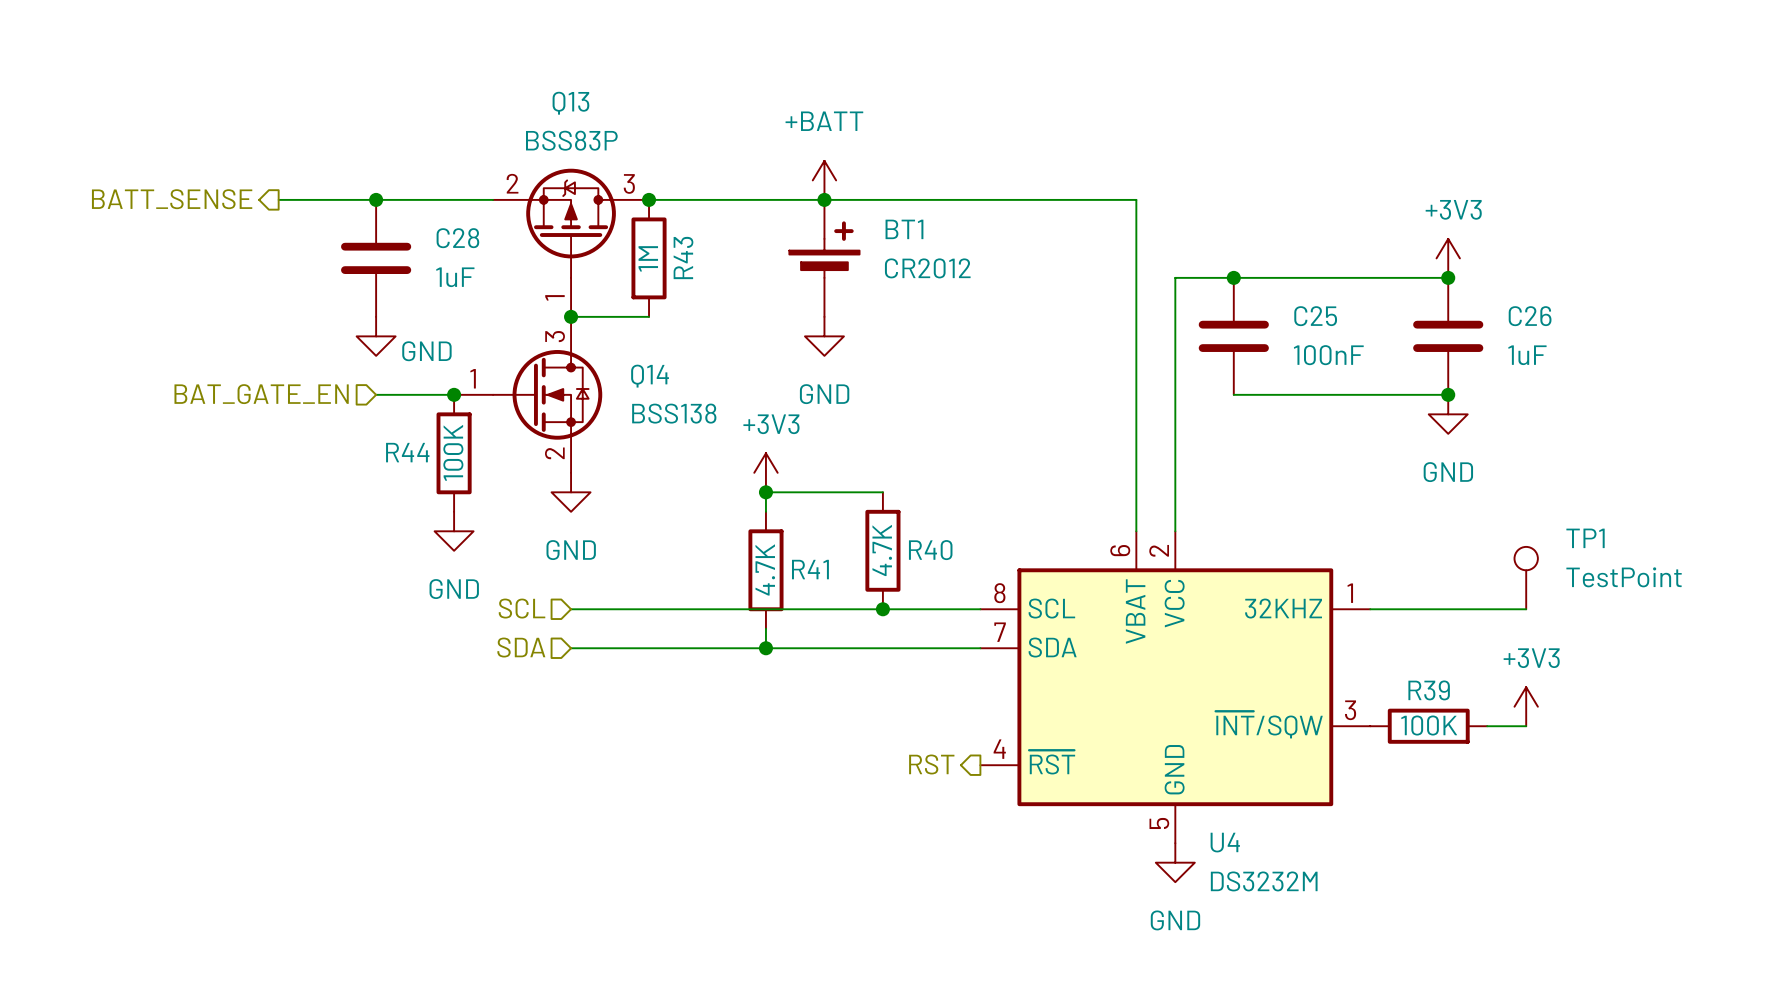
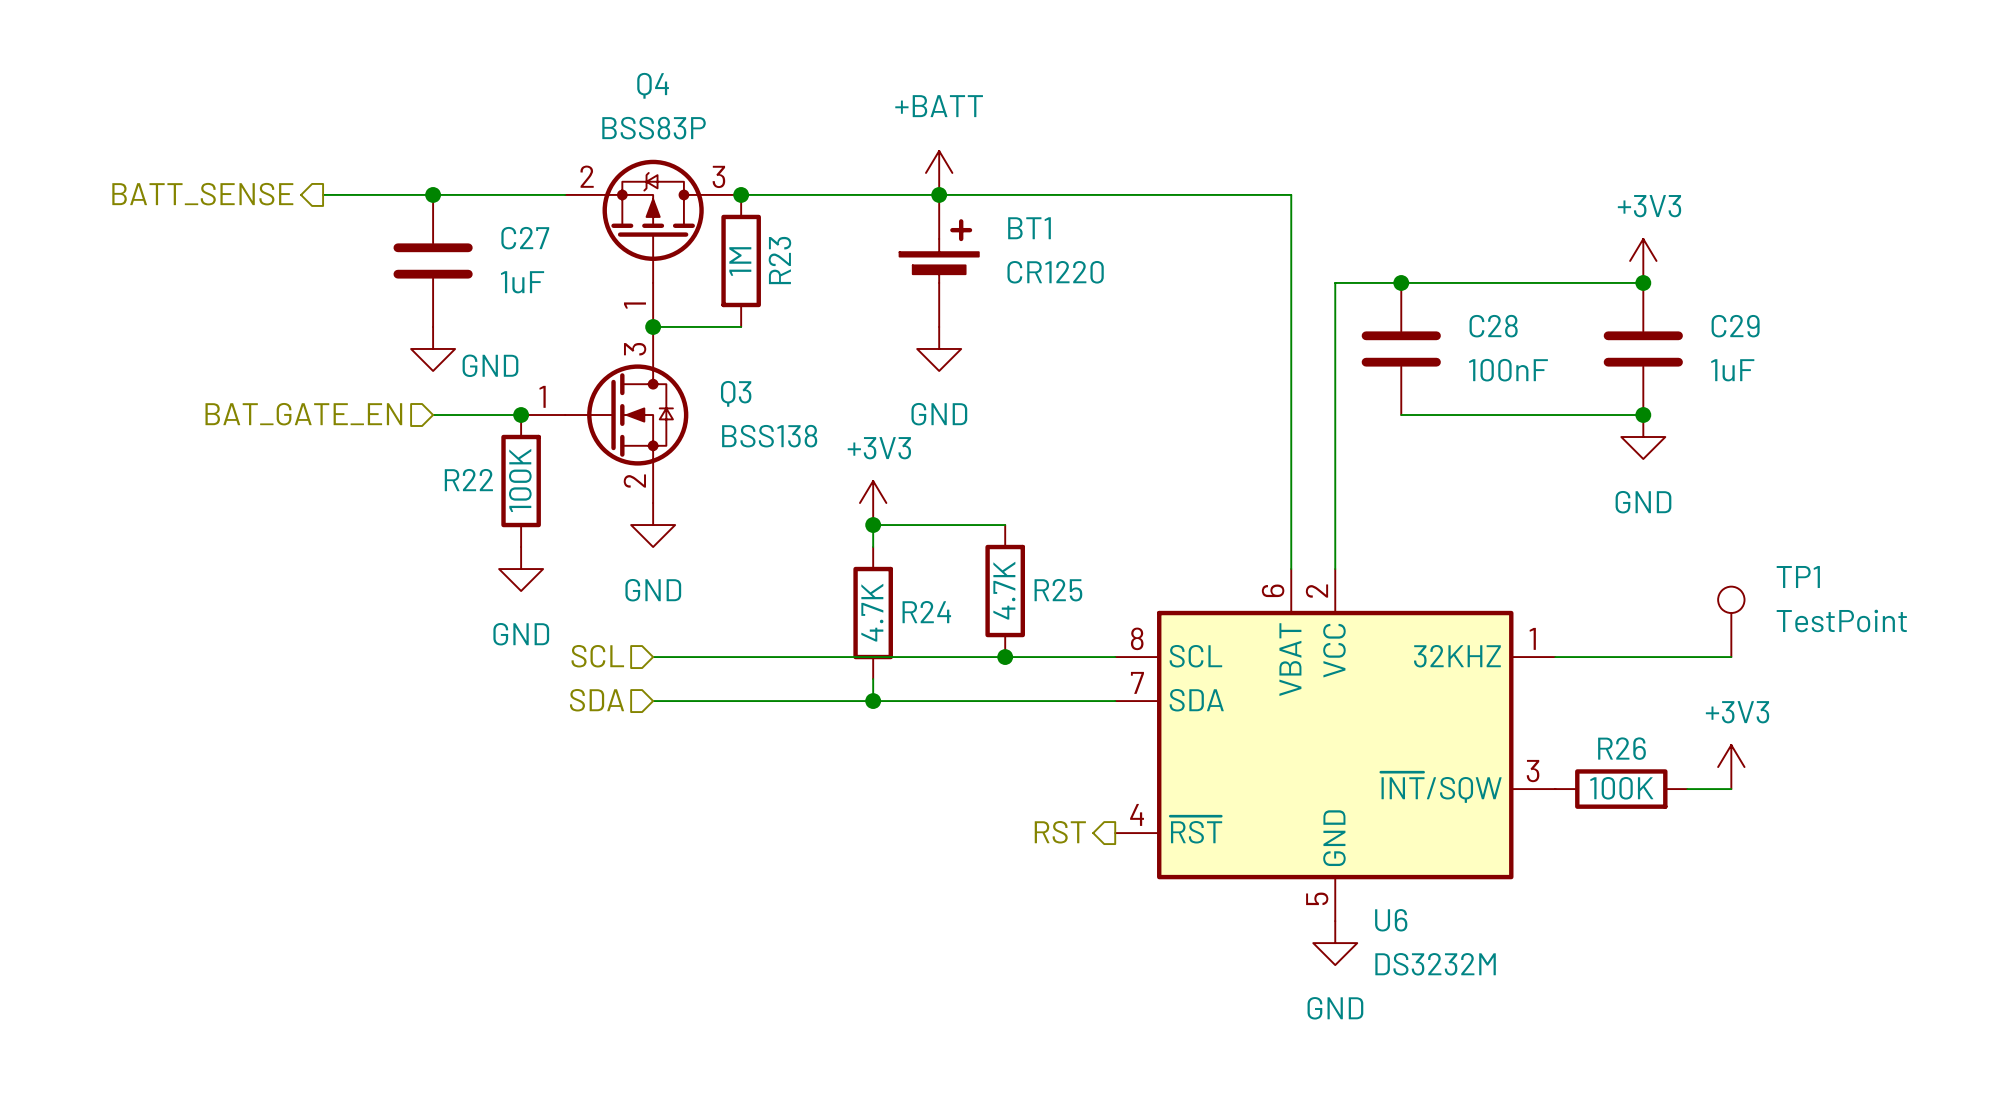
Q13 name: Q13 (570, 103) -> Q4 (653, 85)
C28 name: C28 (457, 238) -> C27 (525, 238)
R43 name: R43 (683, 257) -> R23 (779, 260)
BT1 value: CR2012 (927, 268) -> CR1220 (1055, 272)
C25 name: C25 (1315, 316) -> C28 (1493, 326)
C26 name: C26 (1530, 316) -> C29 (1735, 326)
Q14 name: Q14 (650, 376) -> Q3 (736, 393)
R44 name: R44 (407, 452) -> R22 (468, 480)
R40 name: R40 (930, 550) -> R25 (1058, 590)
R41 name: R41 (810, 569) -> R24 (926, 612)
R39 name: R39 (1429, 690) -> R26 (1622, 748)
U4 name: U4 (1225, 842) -> U6 (1391, 920)

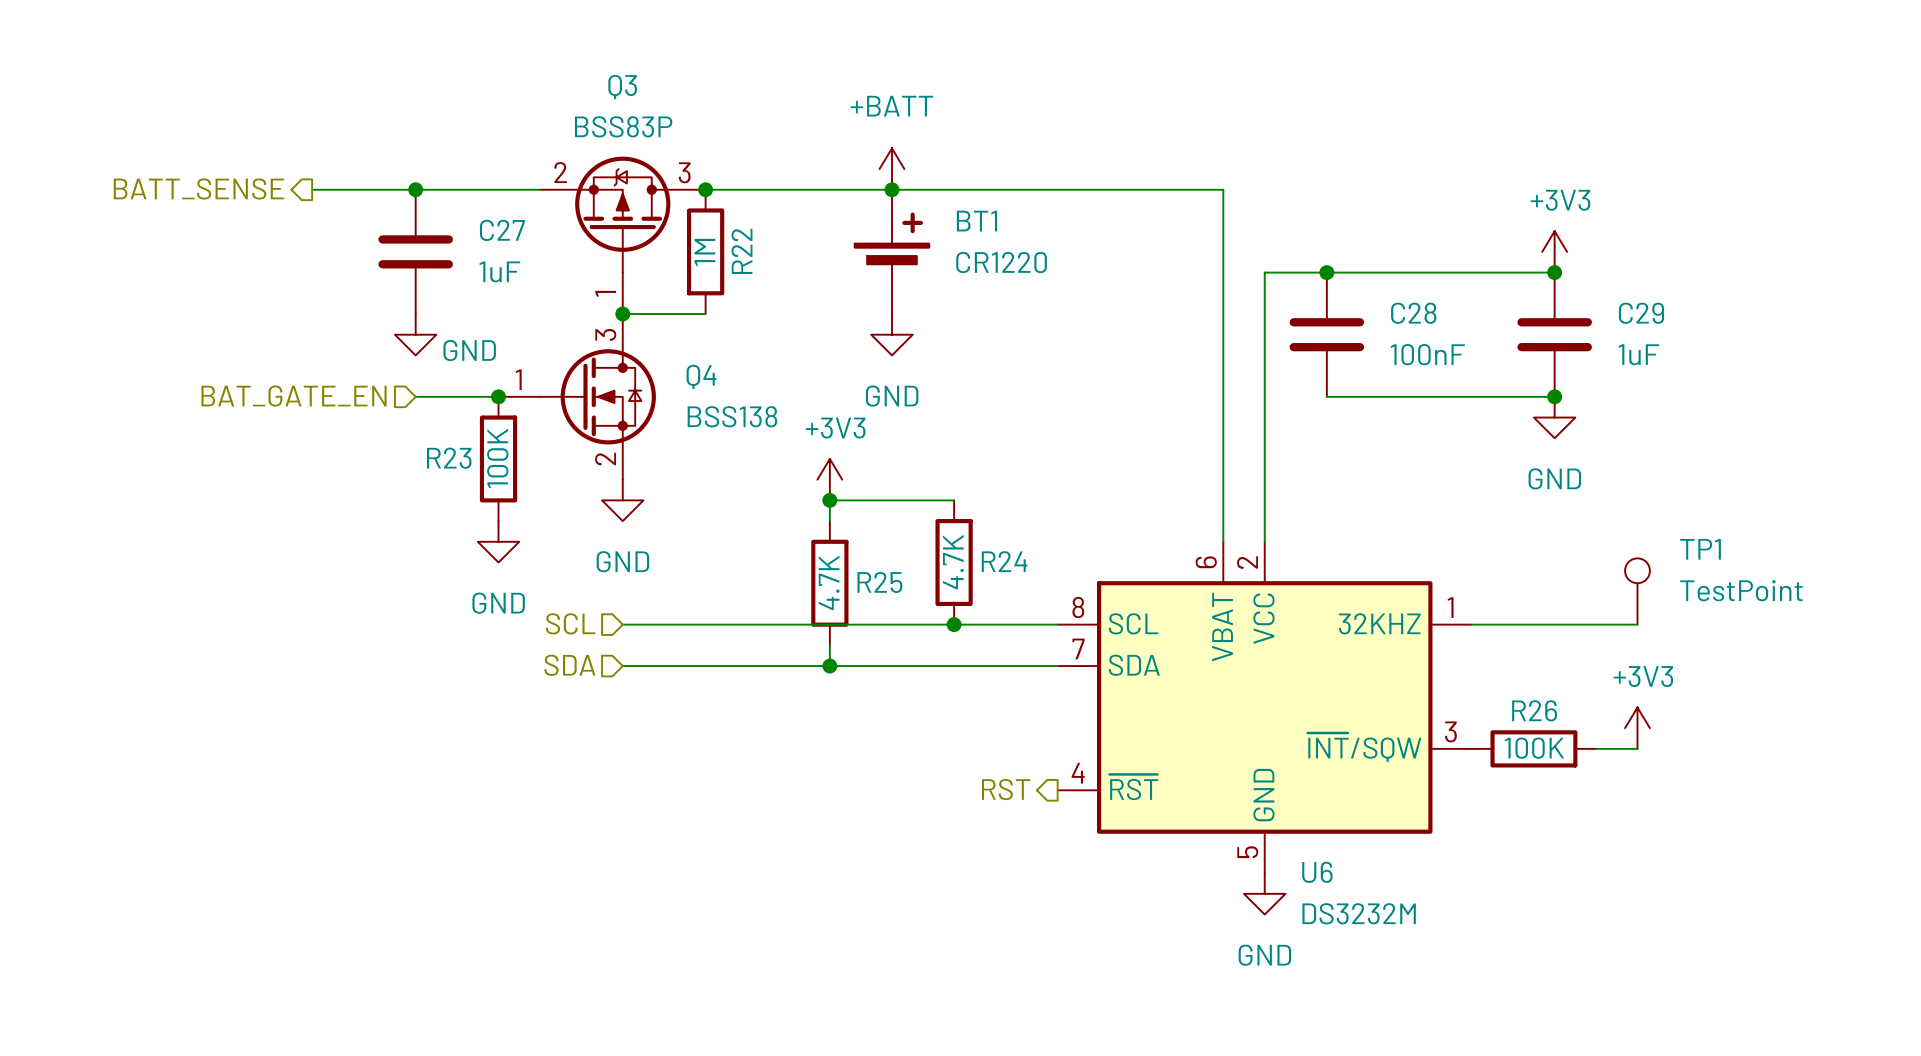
Q4 name: Q4 (653, 85) -> Q3 (622, 87)
R23 name: R23 (779, 260) -> R22 (741, 251)
Q3 name: Q3 (736, 393) -> Q4 (701, 376)
R22 name: R22 (468, 480) -> R23 (449, 458)
R25 name: R25 (1058, 590) -> R24 (1004, 561)
R24 name: R24 (926, 612) -> R25 (879, 582)

